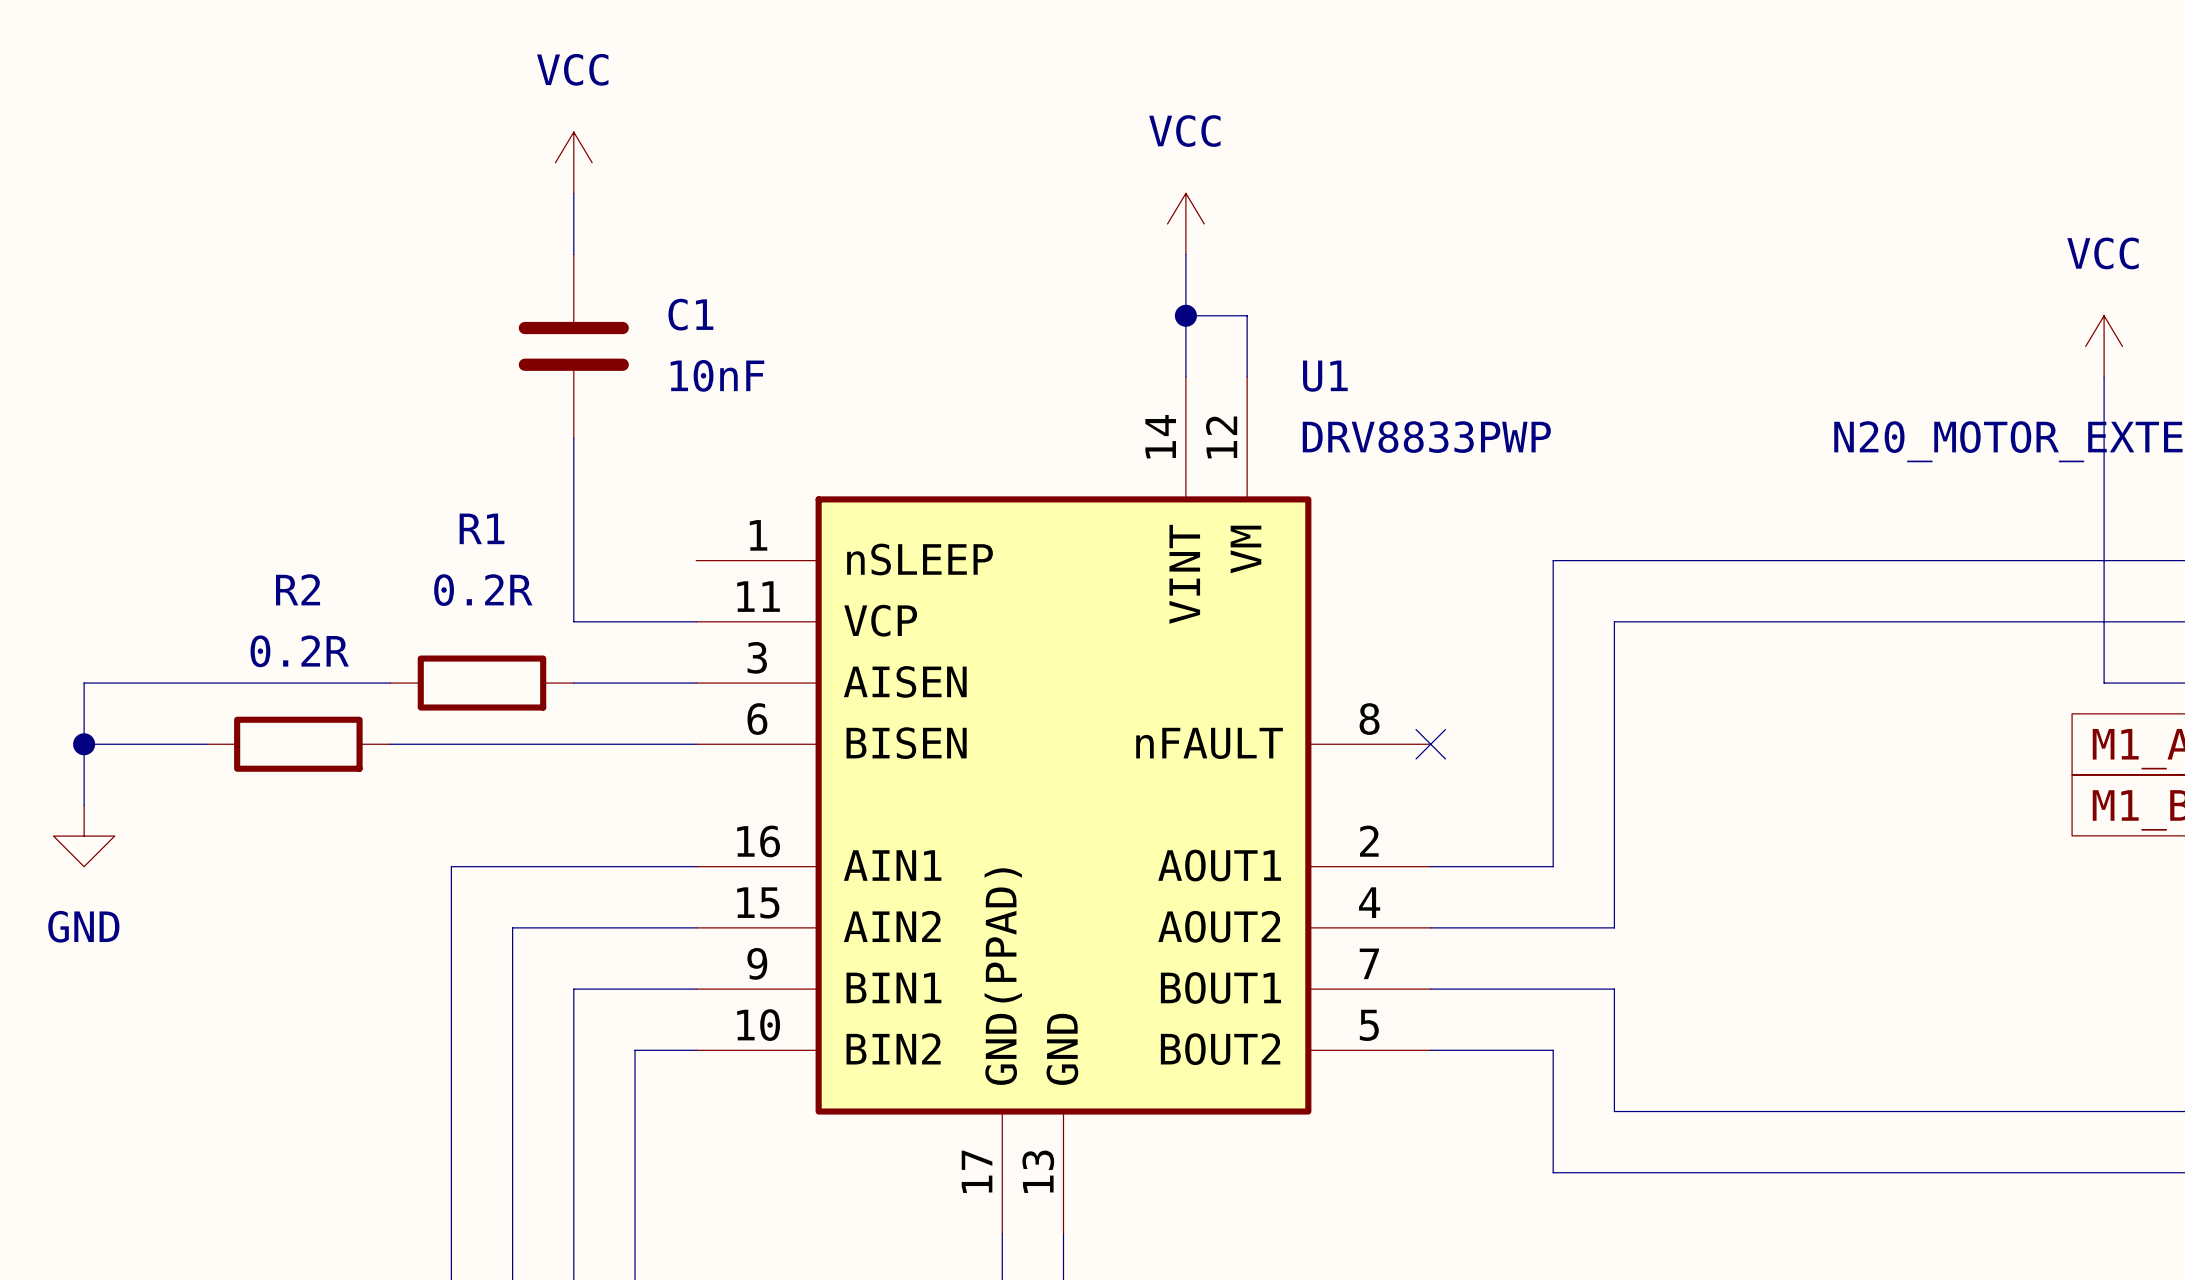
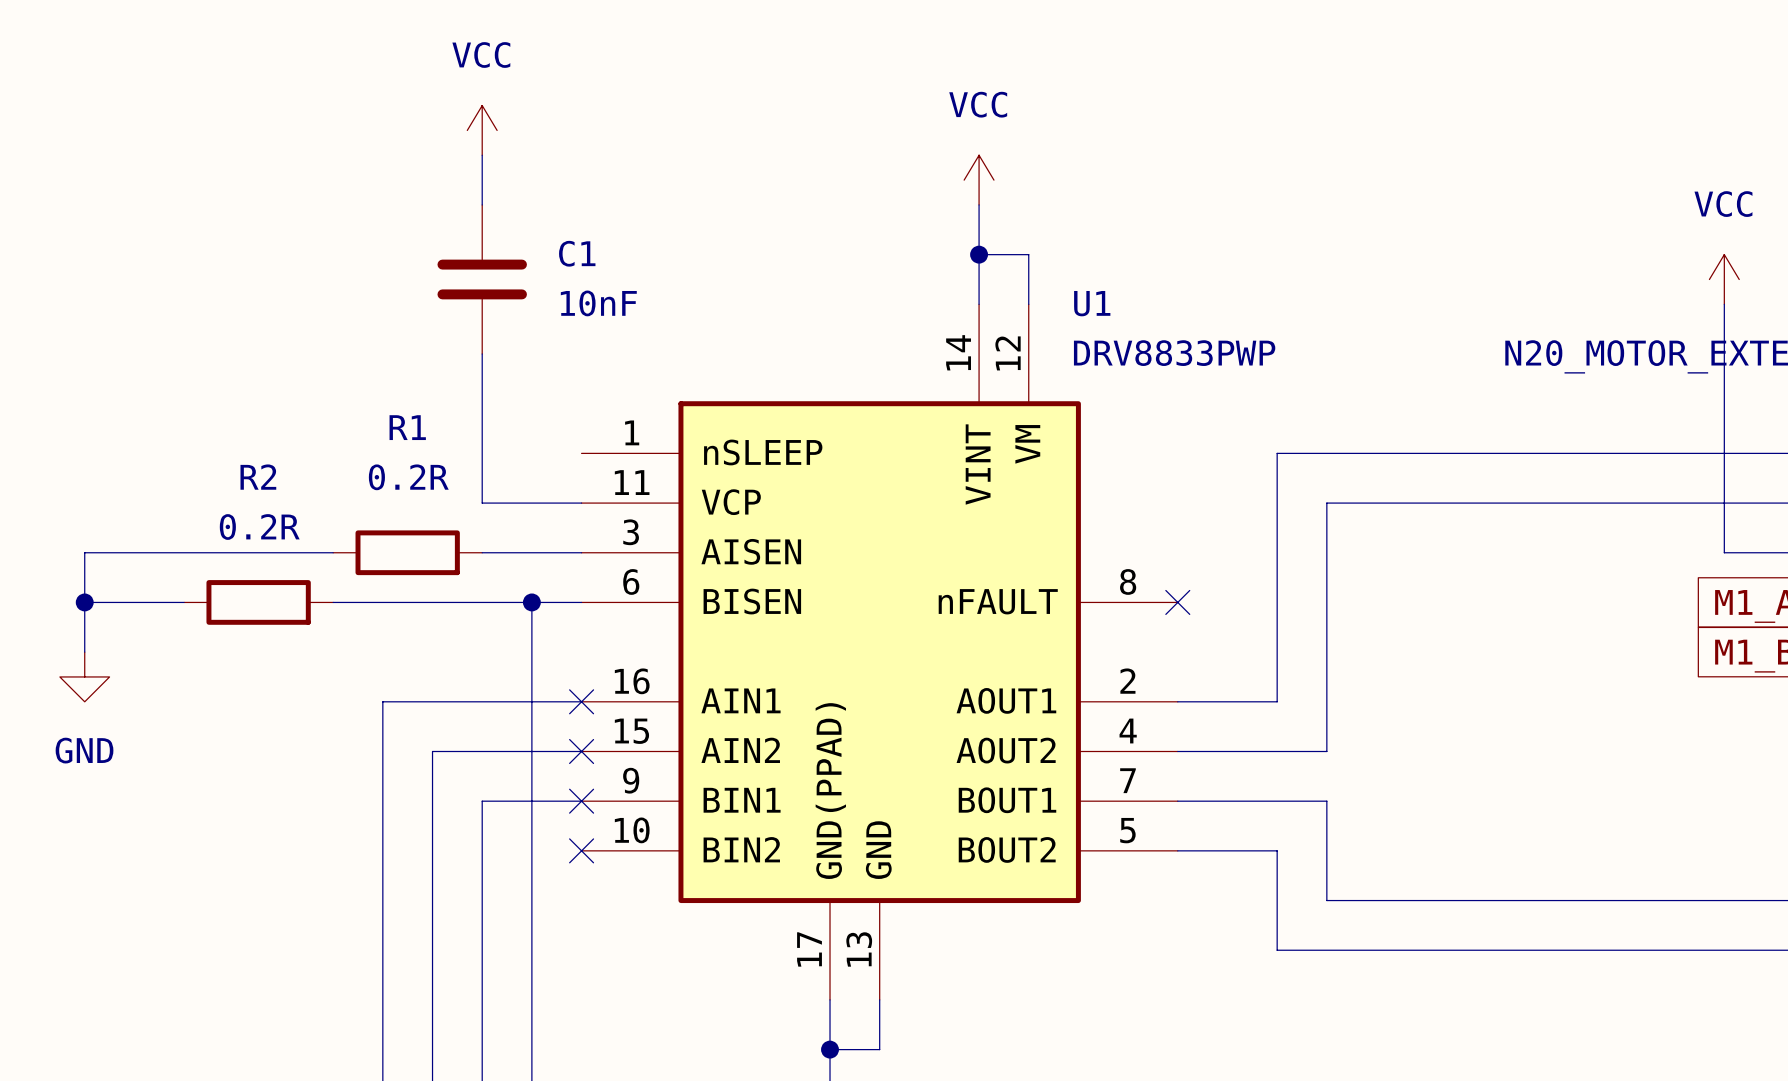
junction: none -> (531, 602)
no-connect mark: none -> (581, 701)
no-connect mark: none -> (581, 751)
no-connect mark: none -> (581, 801)
wire: (635, 1050) (696, 1050) -> (531, 850) (531, 602)
no-connect mark: none -> (581, 850)

